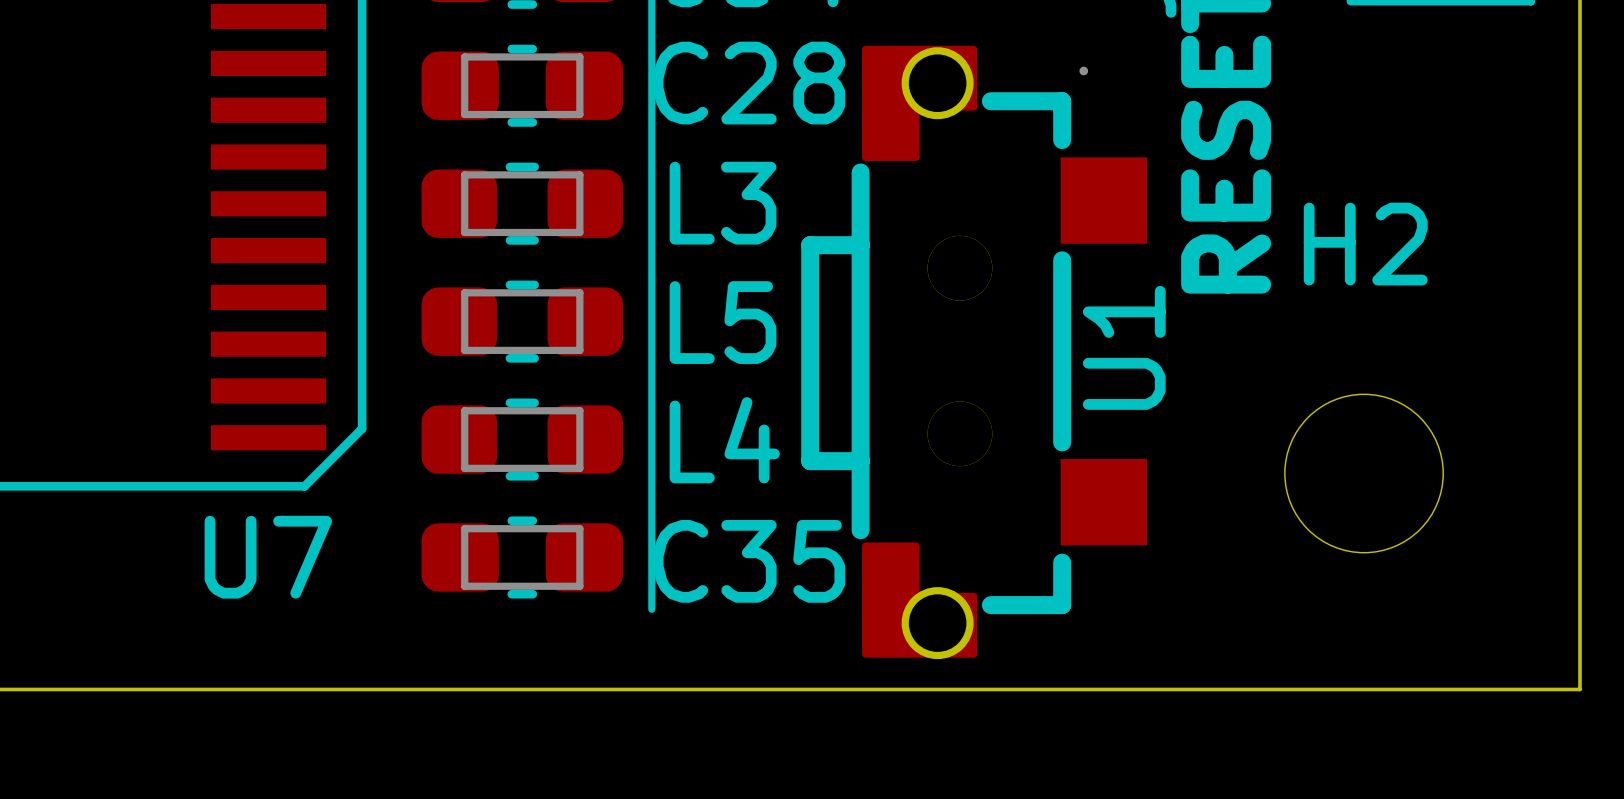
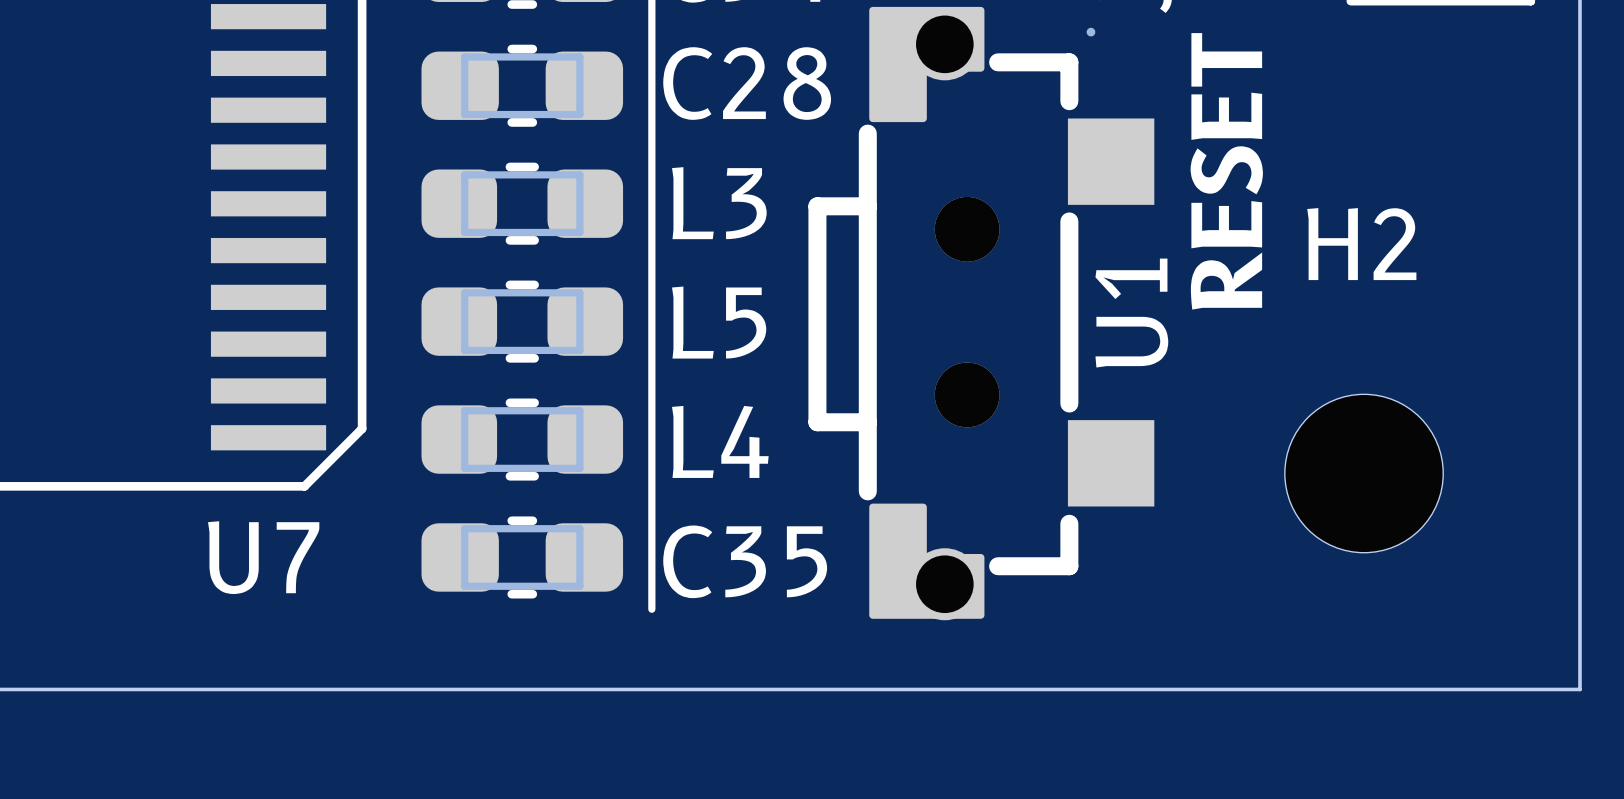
U1 position: (974, 352) -> (981, 313)

